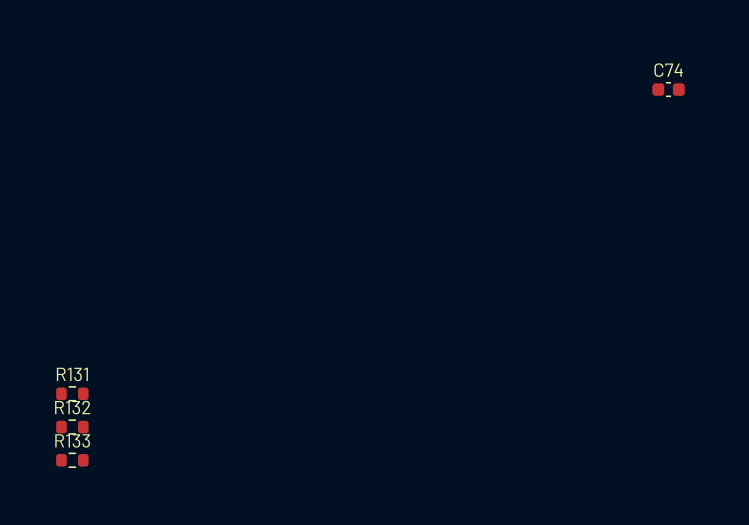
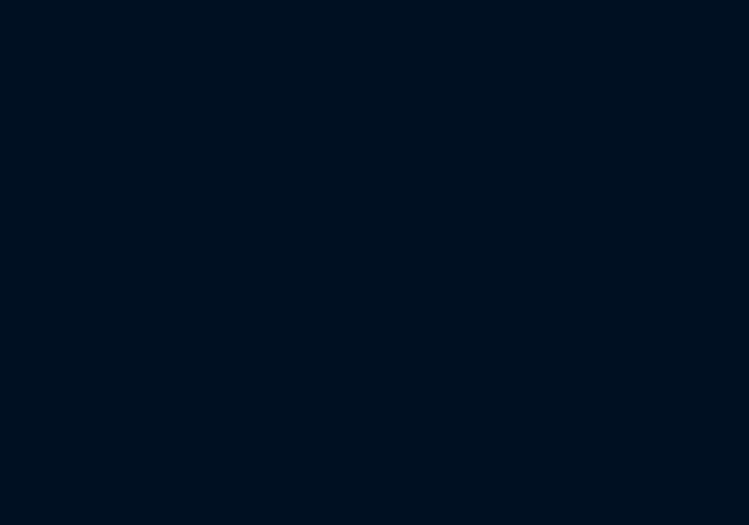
C74: (668, 89) -> none
R131: (72, 393) -> none
R132: (72, 427) -> none
R133: (72, 460) -> none

